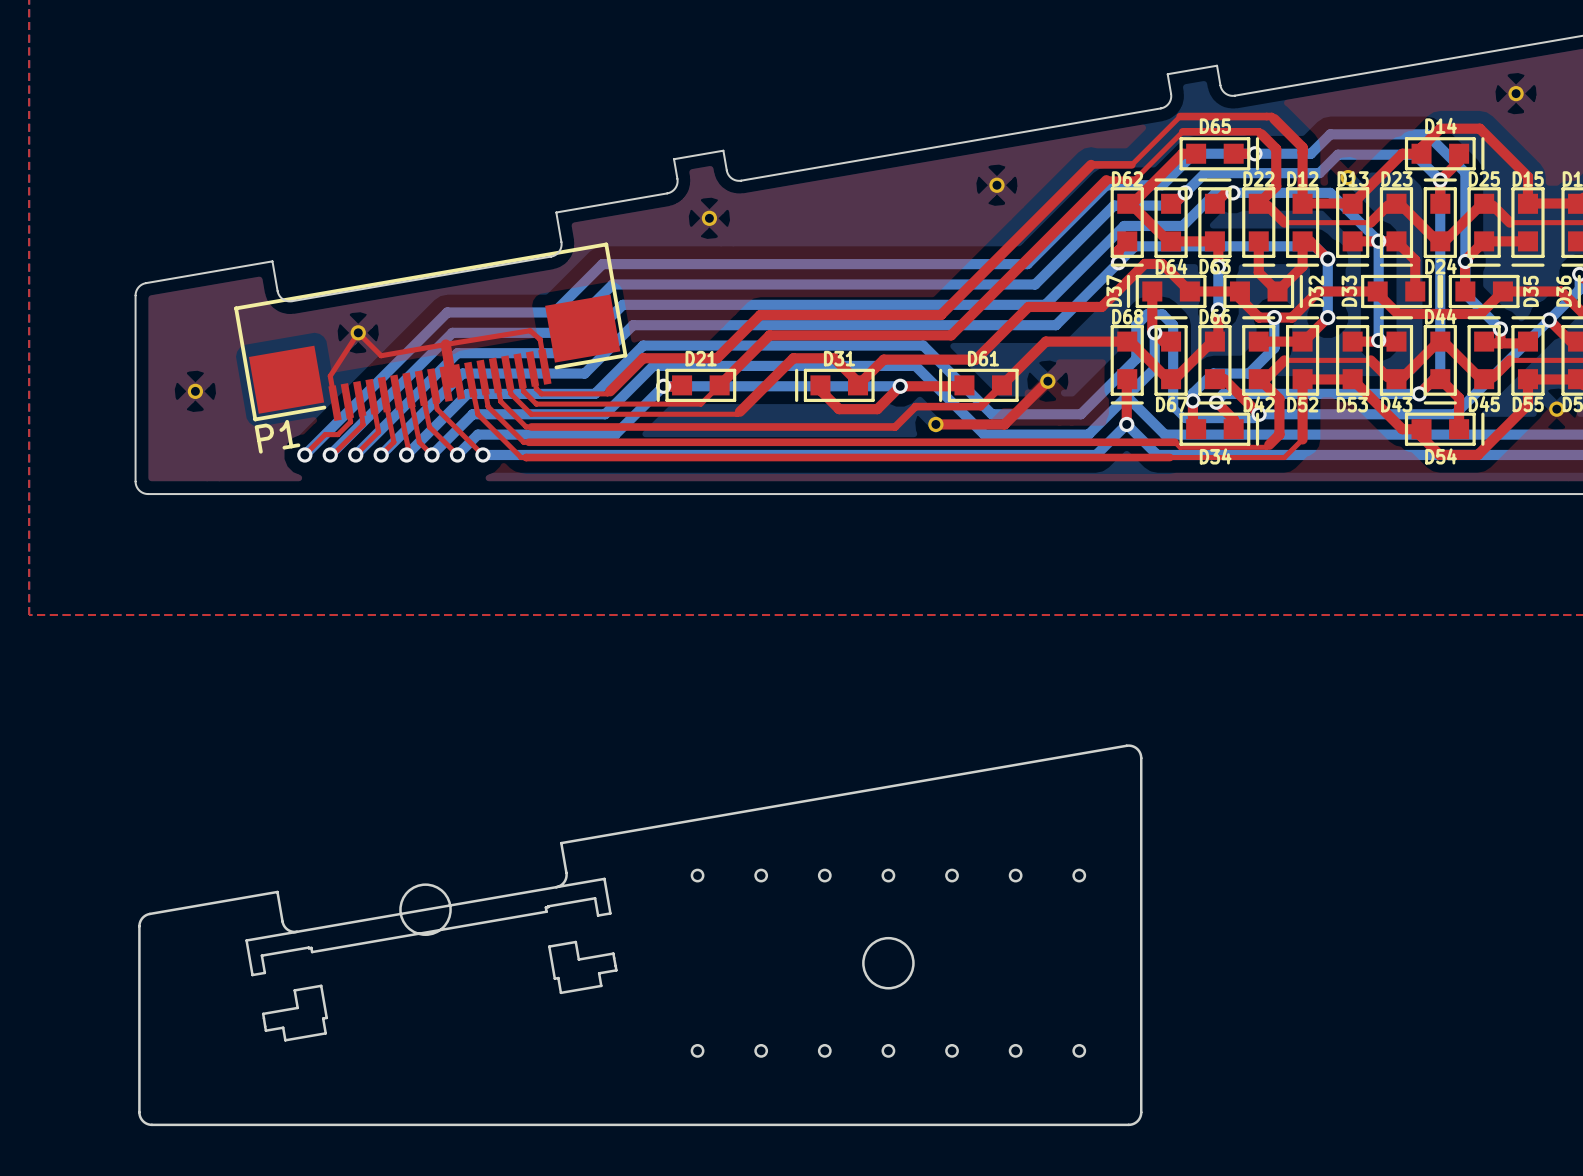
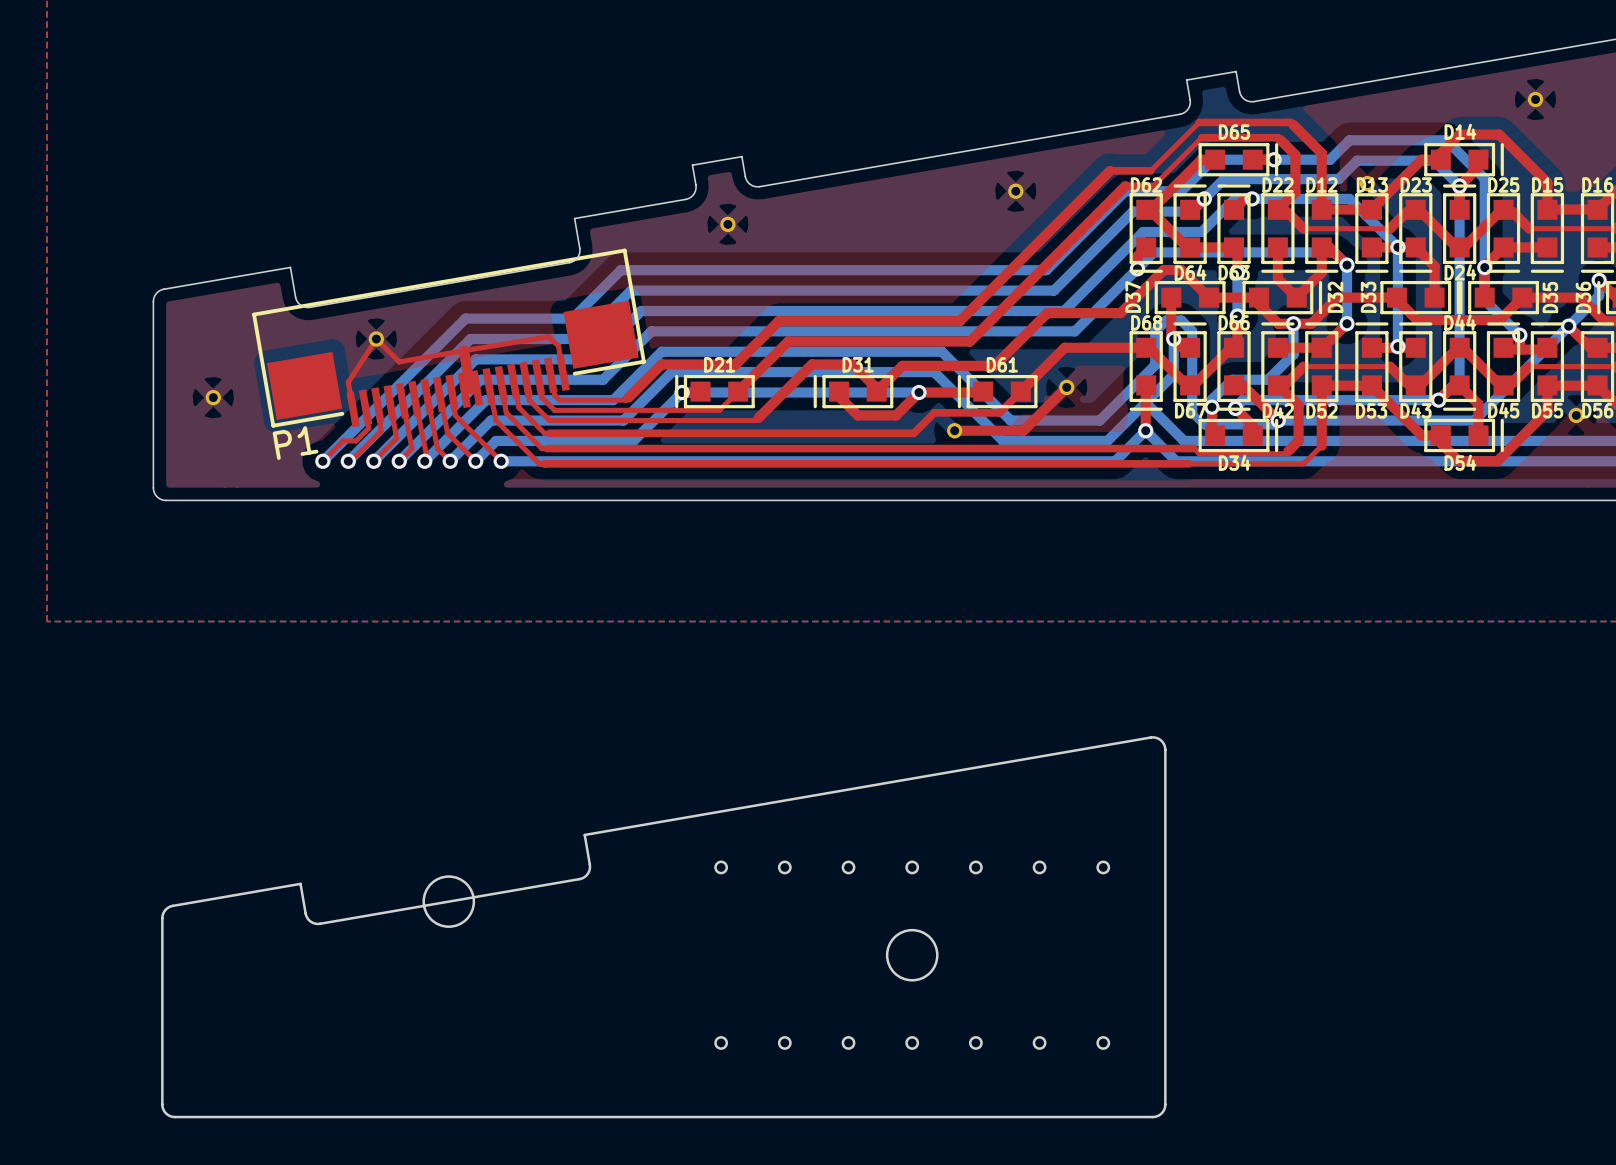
board edge: none -> (1150, 737) (584, 834) (589, 867) (586, 875) (579, 879) (318, 923) (310, 921) (306, 916) (300, 883) (169, 906) (164, 911) (162, 918) (163, 1109) (167, 1114) (174, 1117) (1157, 1116) (1162, 1112) (1165, 1104) (1165, 749) (1160, 740) (1150, 737)
round board edge: none -> [714, 860, 729, 875]
round board edge: none -> [777, 860, 792, 875]
round board edge: none -> [905, 860, 920, 875]
round board edge: [690, 868, 705, 883] -> none
round board edge: [754, 868, 769, 883] -> none
round board edge: [881, 868, 896, 883] -> none
round board edge position: (824, 875) -> (848, 867)
round board edge position: (952, 875) -> (975, 867)
round board edge position: (1015, 875) -> (1039, 867)
round board edge position: (1079, 875) -> (1103, 867)
board edge: (604, 878) (246, 940) (252, 975) (264, 972) (261, 955) (308, 947) (311, 947) (312, 952) (546, 911) (545, 907) (548, 906) (595, 898) (598, 915) (610, 913) (604, 878) -> none
board edge: (556, 887) (563, 883) (566, 876) (561, 843) (1126, 745) (1132, 746) (1138, 750) (1141, 758) (1140, 1117) (1136, 1122) (1128, 1124) (151, 1124) (144, 1122) (139, 1112) (139, 926) (142, 918) (149, 913) (277, 891) (283, 924) (289, 930) (297, 931) -> none
round board edge position: (425, 909) -> (448, 901)
board edge: (575, 942) (549, 946) (554, 978) (558, 978) (560, 992) (601, 985) (599, 973) (616, 970) (613, 953) (578, 959) (575, 942) -> none
round board edge position: (888, 963) -> (912, 955)
board edge: (321, 985) (294, 990) (297, 1007) (263, 1013) (265, 1030) (283, 1027) (285, 1040) (325, 1033) (323, 1018) (326, 1017) (321, 985) -> none
round board edge: none -> [714, 1036, 729, 1050]
round board edge: none -> [777, 1036, 792, 1050]
round board edge: none -> [905, 1036, 920, 1050]
round board edge: [690, 1043, 705, 1058] -> none
round board edge: [754, 1043, 769, 1058] -> none
round board edge: [881, 1043, 896, 1058] -> none
round board edge position: (824, 1050) -> (848, 1042)
round board edge position: (952, 1050) -> (975, 1042)
round board edge position: (1015, 1050) -> (1039, 1042)
round board edge position: (1079, 1050) -> (1103, 1042)

